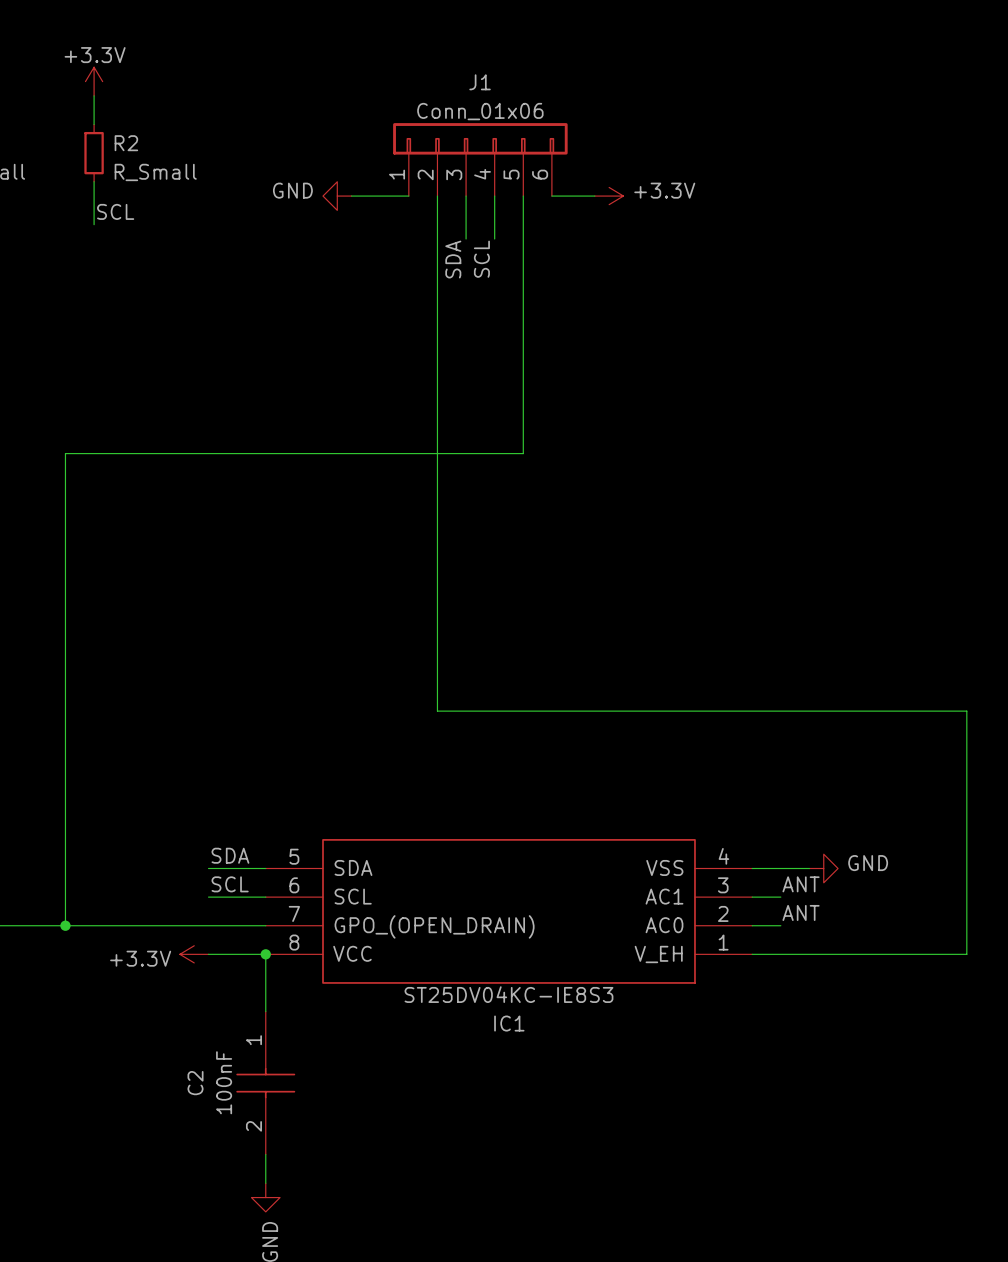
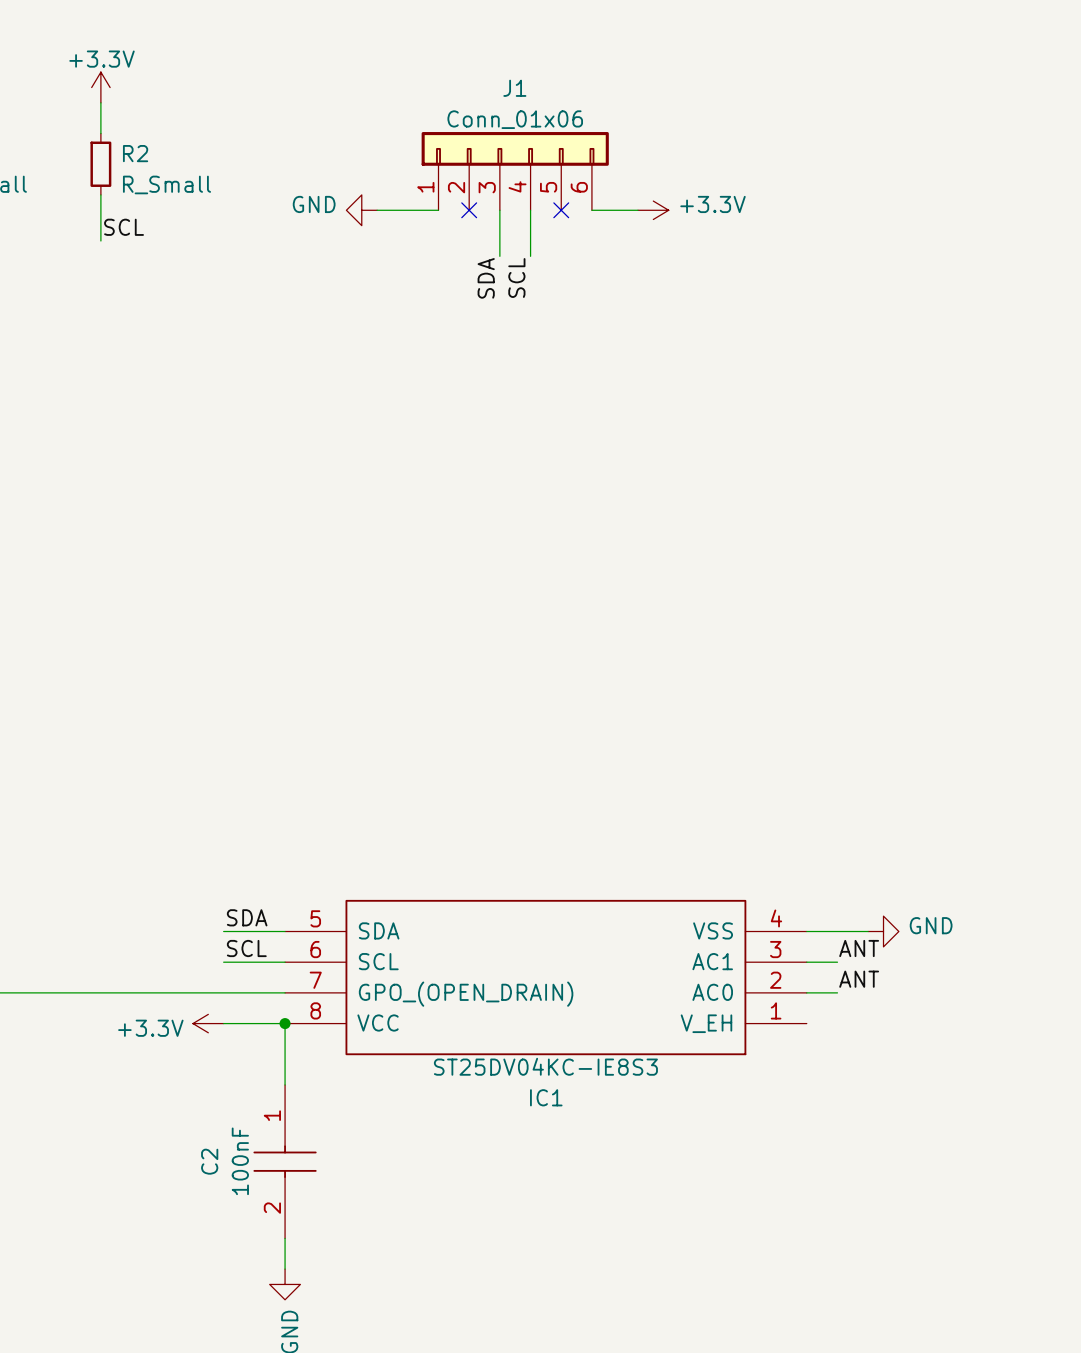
wire: (437, 196) (437, 711) (966, 711) (966, 954) (752, 954) -> none
no-connect mark: none -> (469, 210)
wire: (523, 196) (523, 453) (65, 453) (65, 925) -> none
no-connect mark: none -> (561, 210)
junction: (65, 925) -> none

